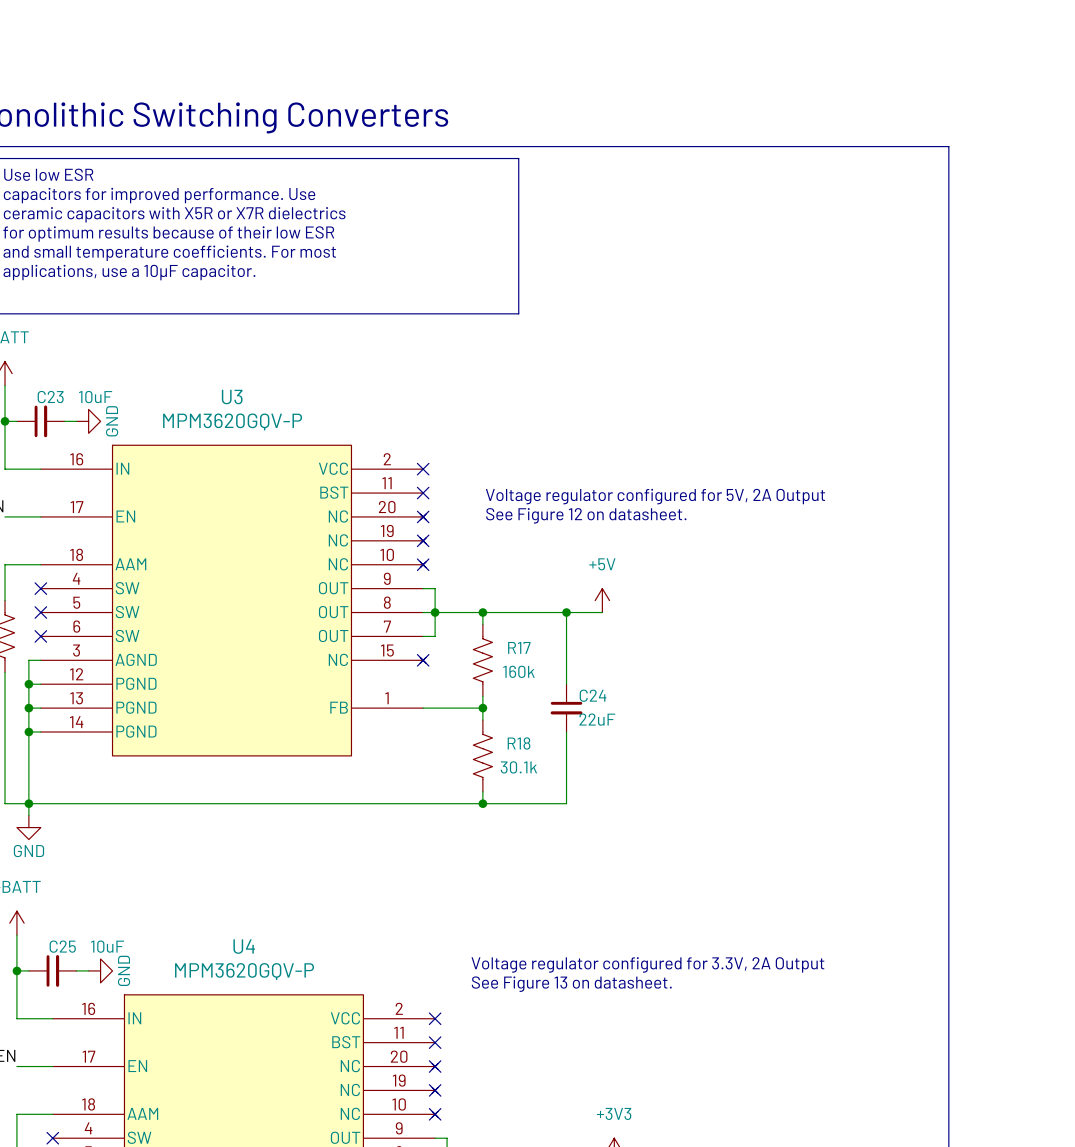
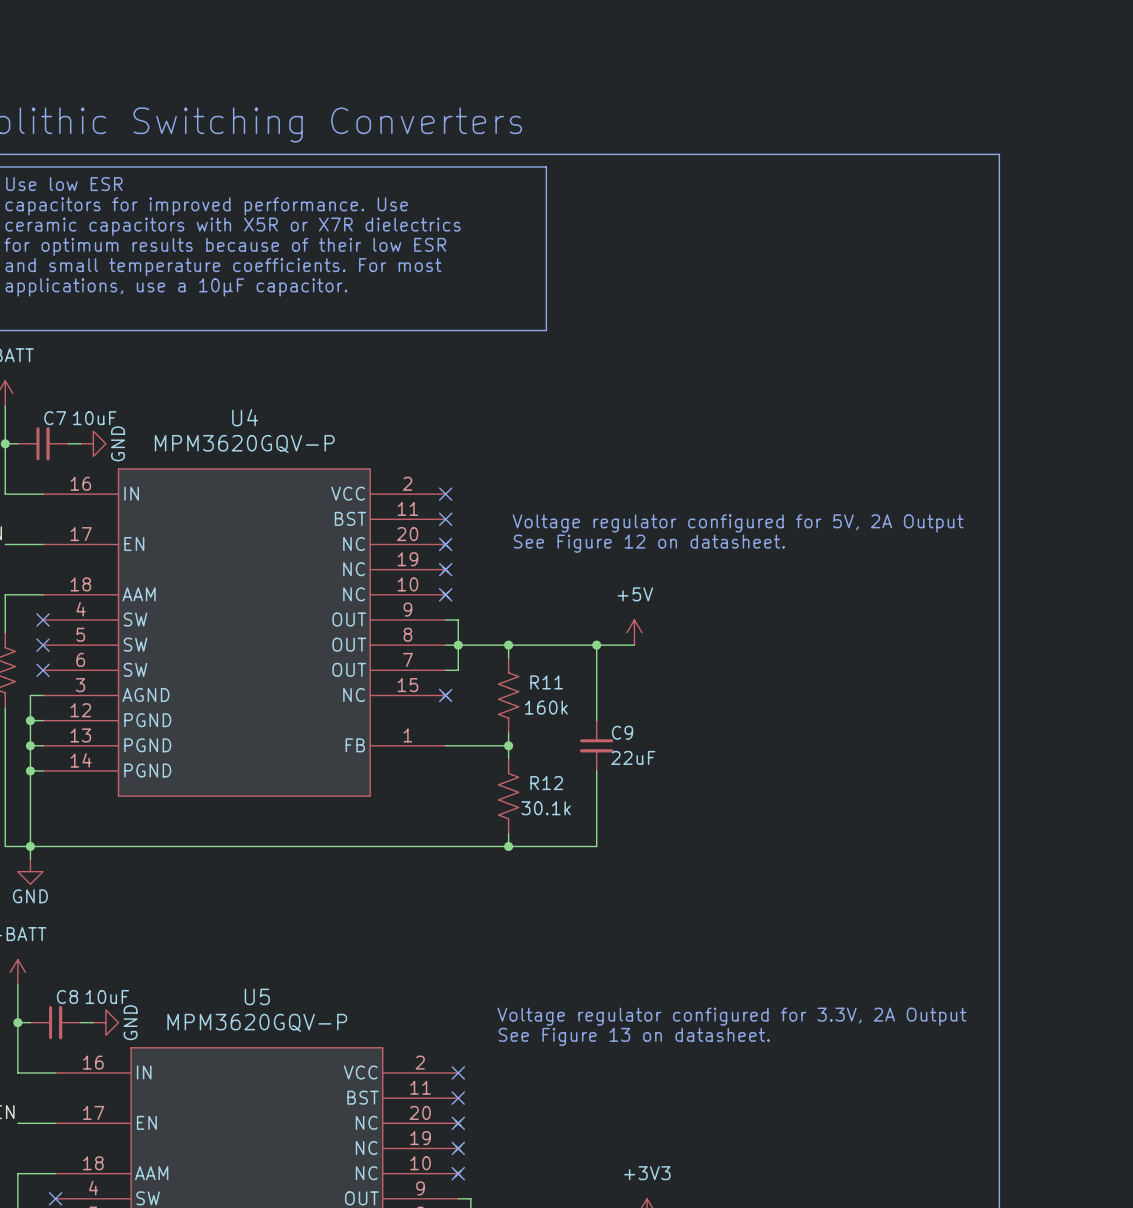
C23 name: C23 (50, 397) -> C7 (55, 418)
U3 name: U3 (232, 397) -> U4 (245, 417)
R17 name: R17 (519, 647) -> R11 (546, 682)
C24 name: C24 (593, 695) -> C9 (622, 732)
R18 name: R18 (519, 743) -> R12 (546, 783)
C25 name: C25 (62, 946) -> C8 (67, 997)
U4 name: U4 (244, 946) -> U5 (257, 996)

